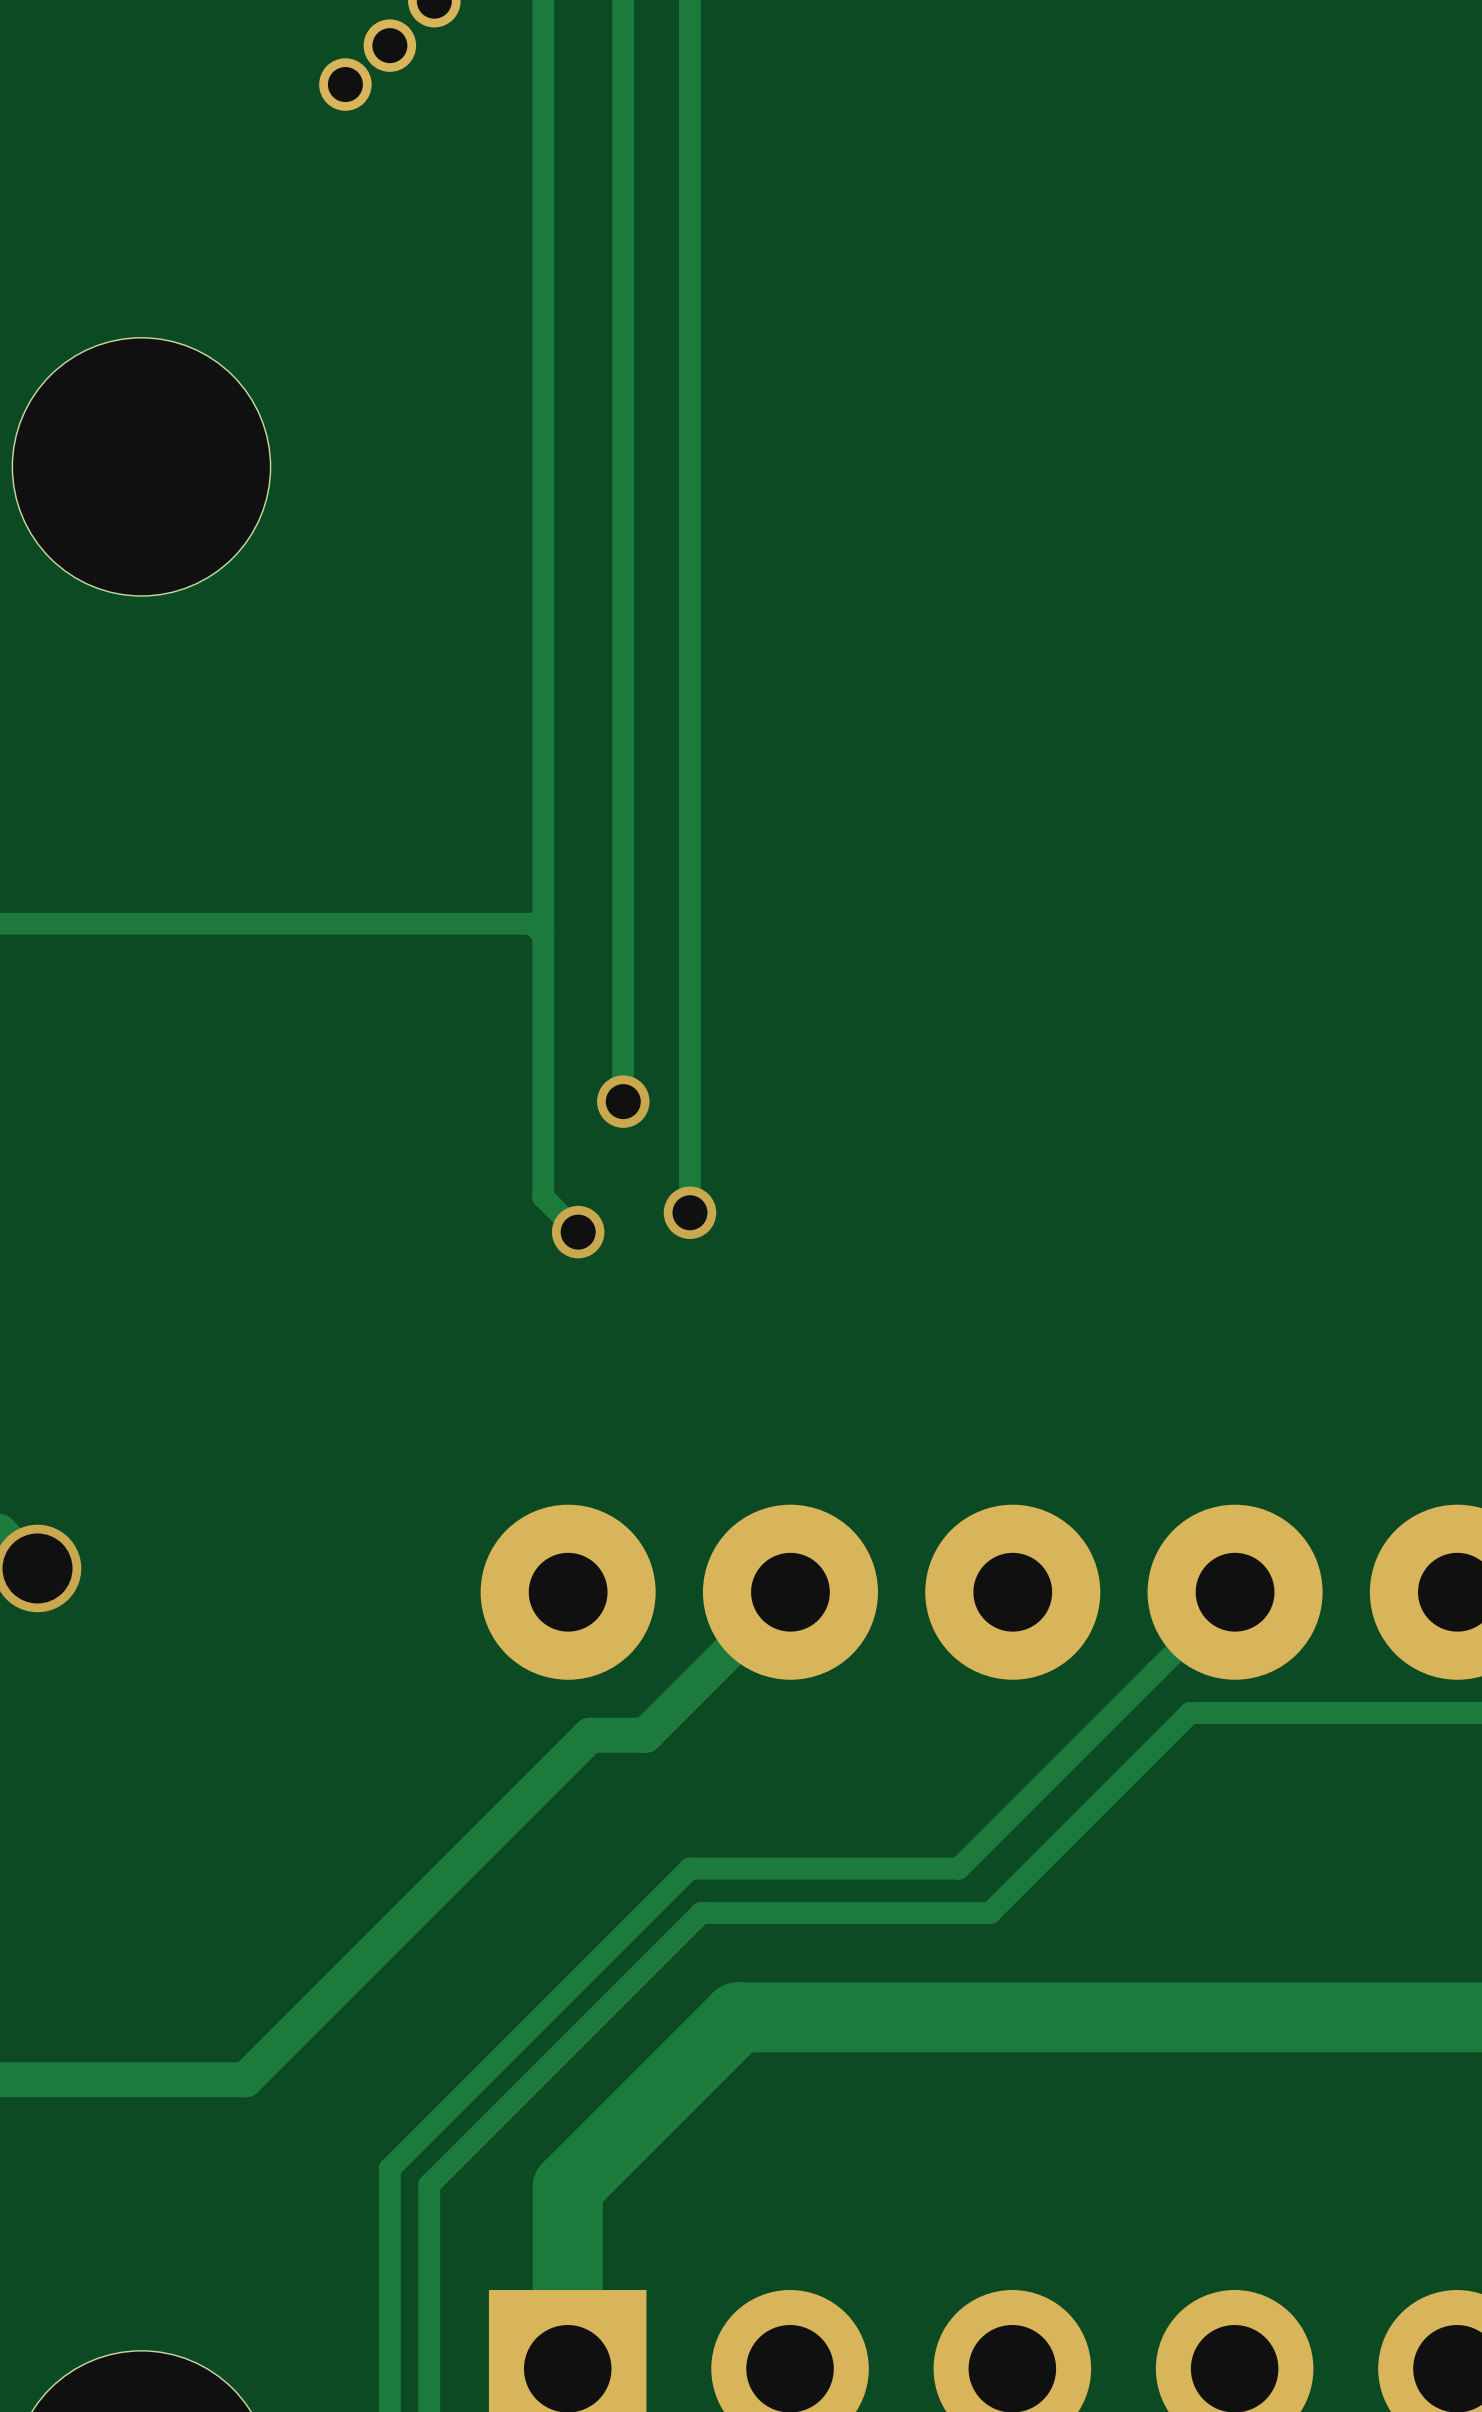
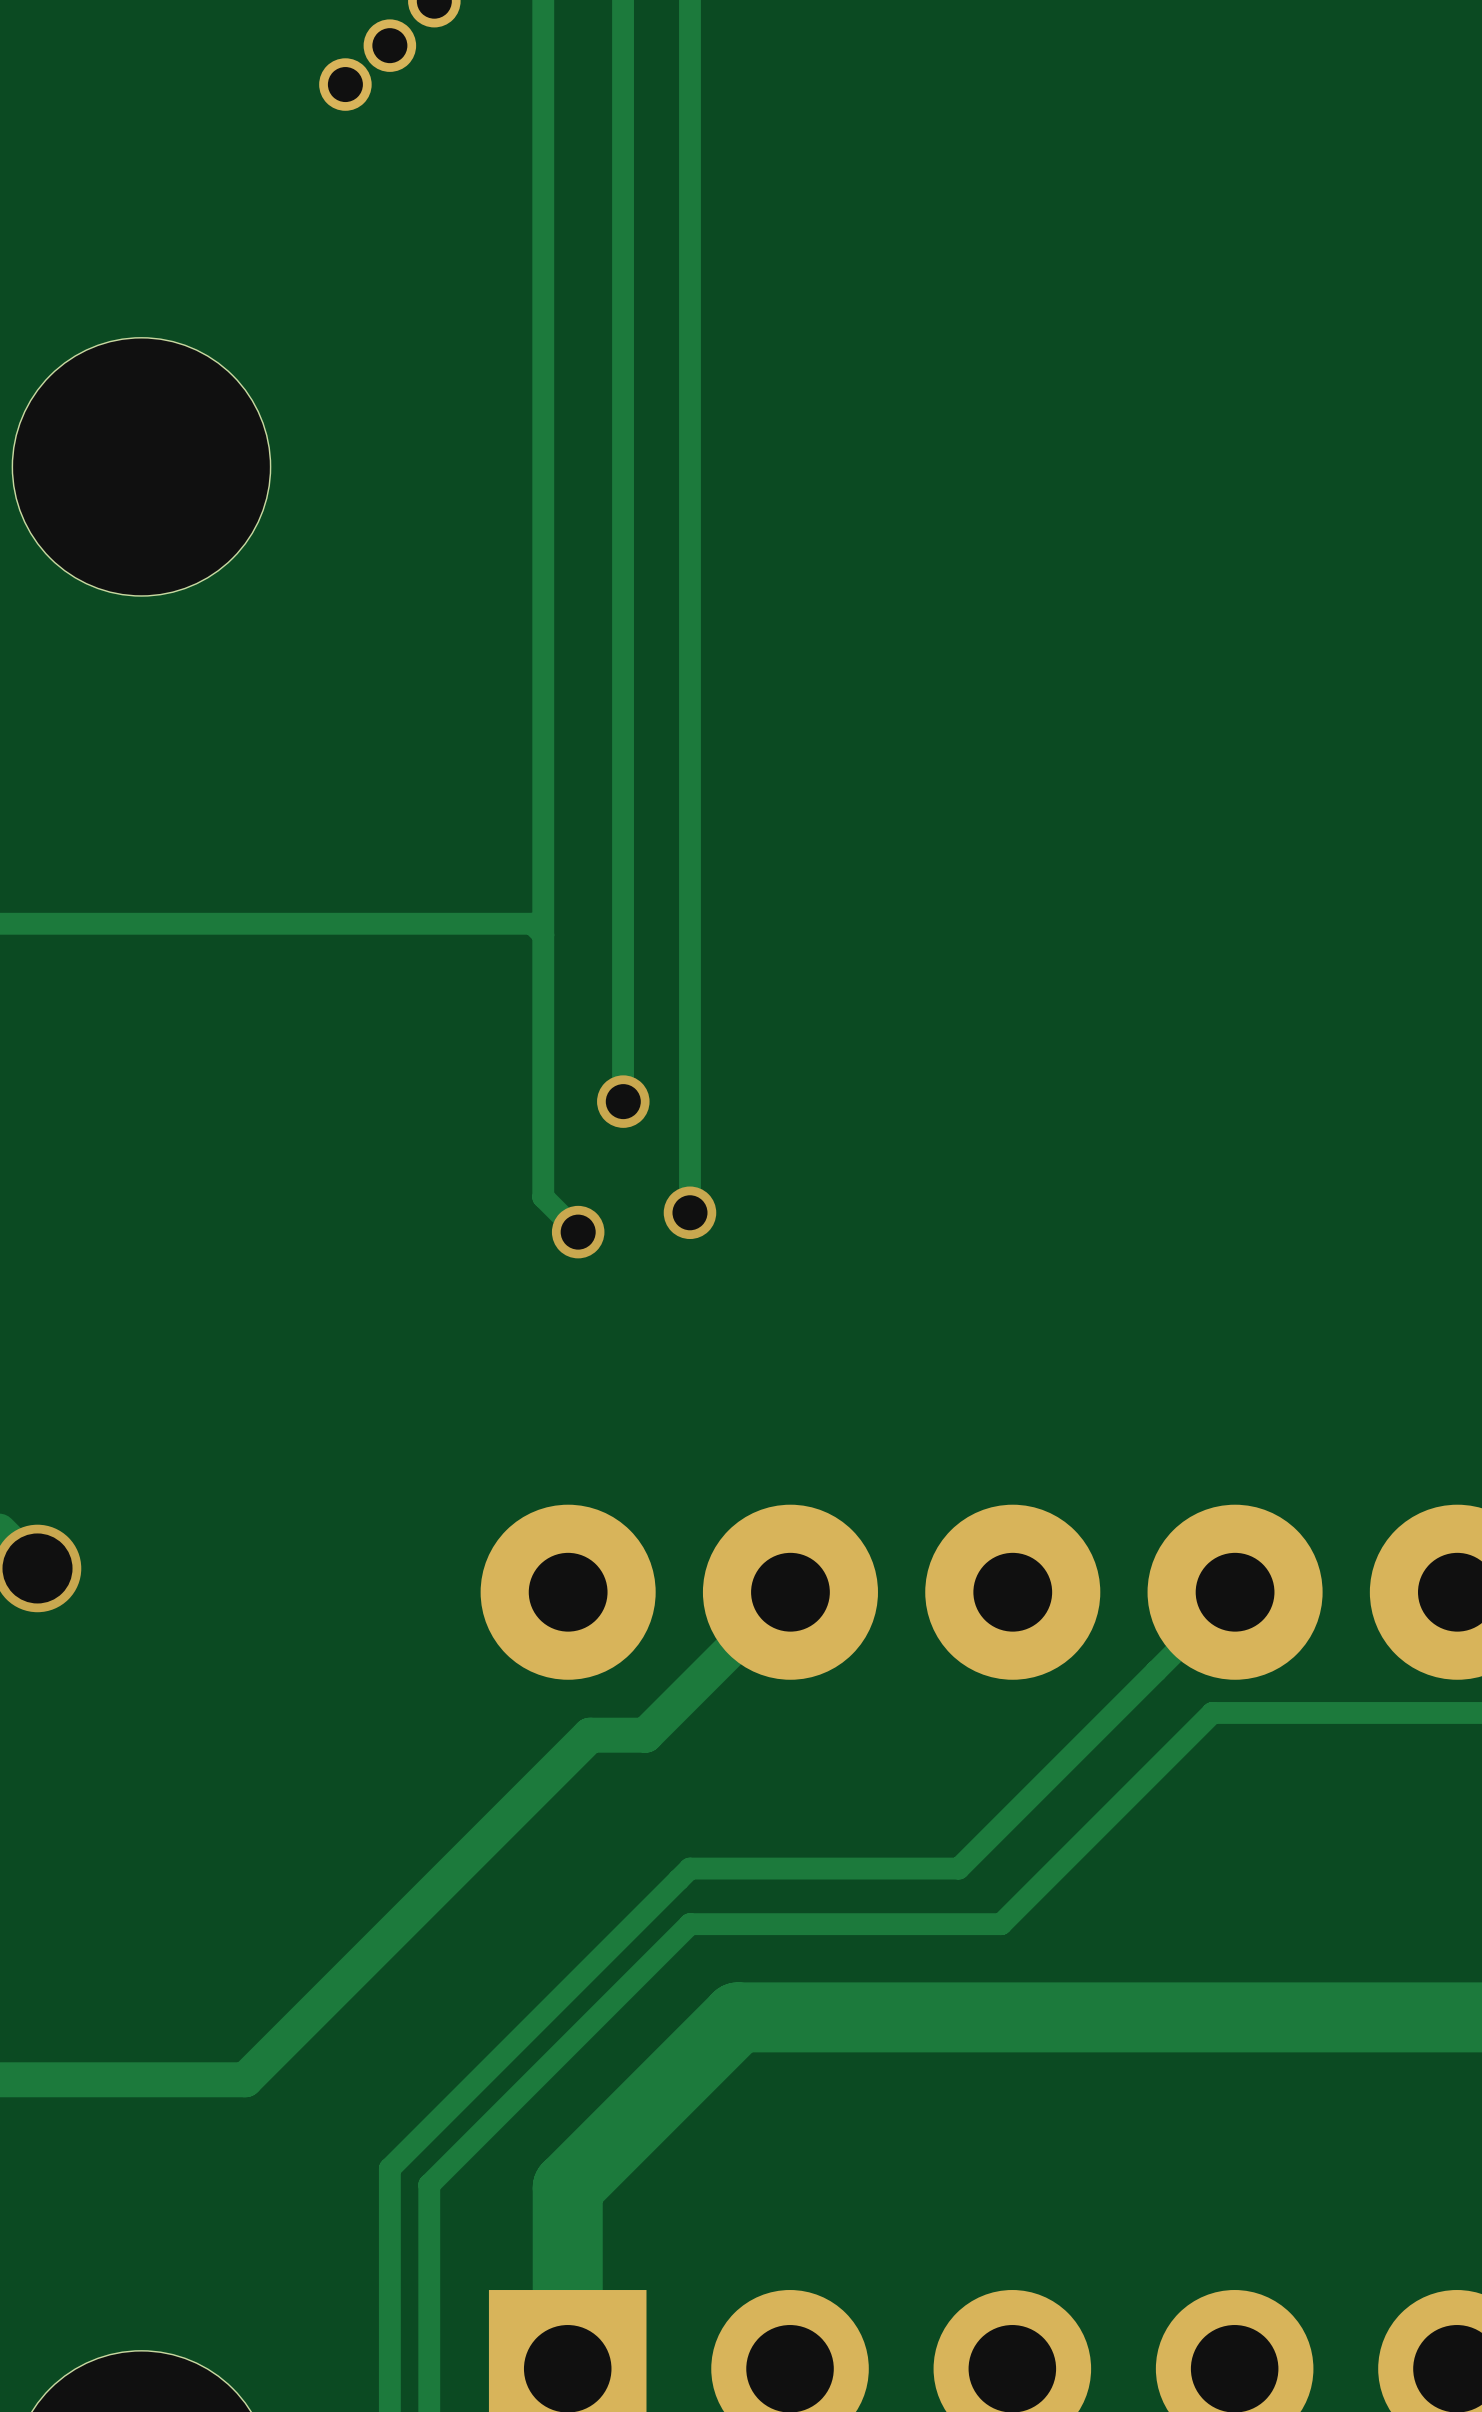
track: (1212, 1712) (1190, 1712) (990, 1913) (701, 1913) (689, 1924) -> (1212, 1712) (1001, 1924) (689, 1924)

